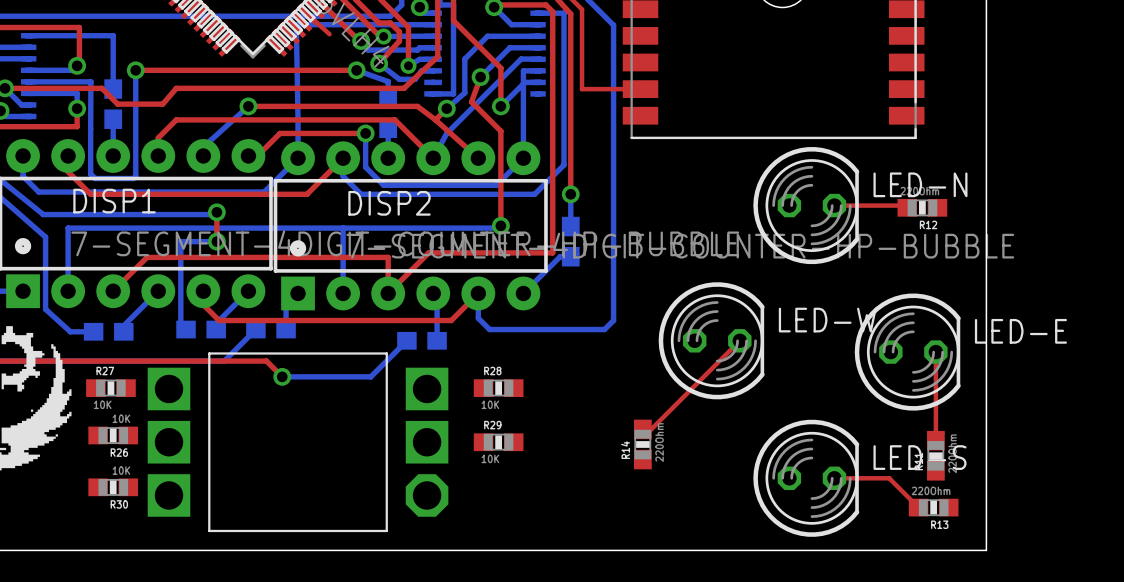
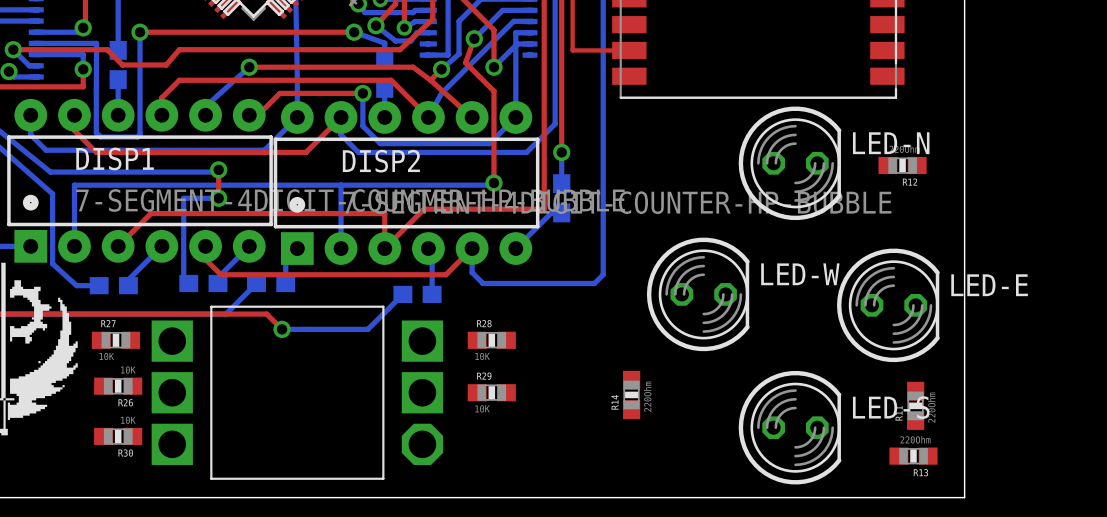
top track: (834, 205) (905, 205) (907, 207) -> none
top track: (739, 340) (651, 429) (642, 429) -> none
top track: (935, 352) (935, 440) -> none
top track: (834, 478) (889, 478) (918, 507) -> none

